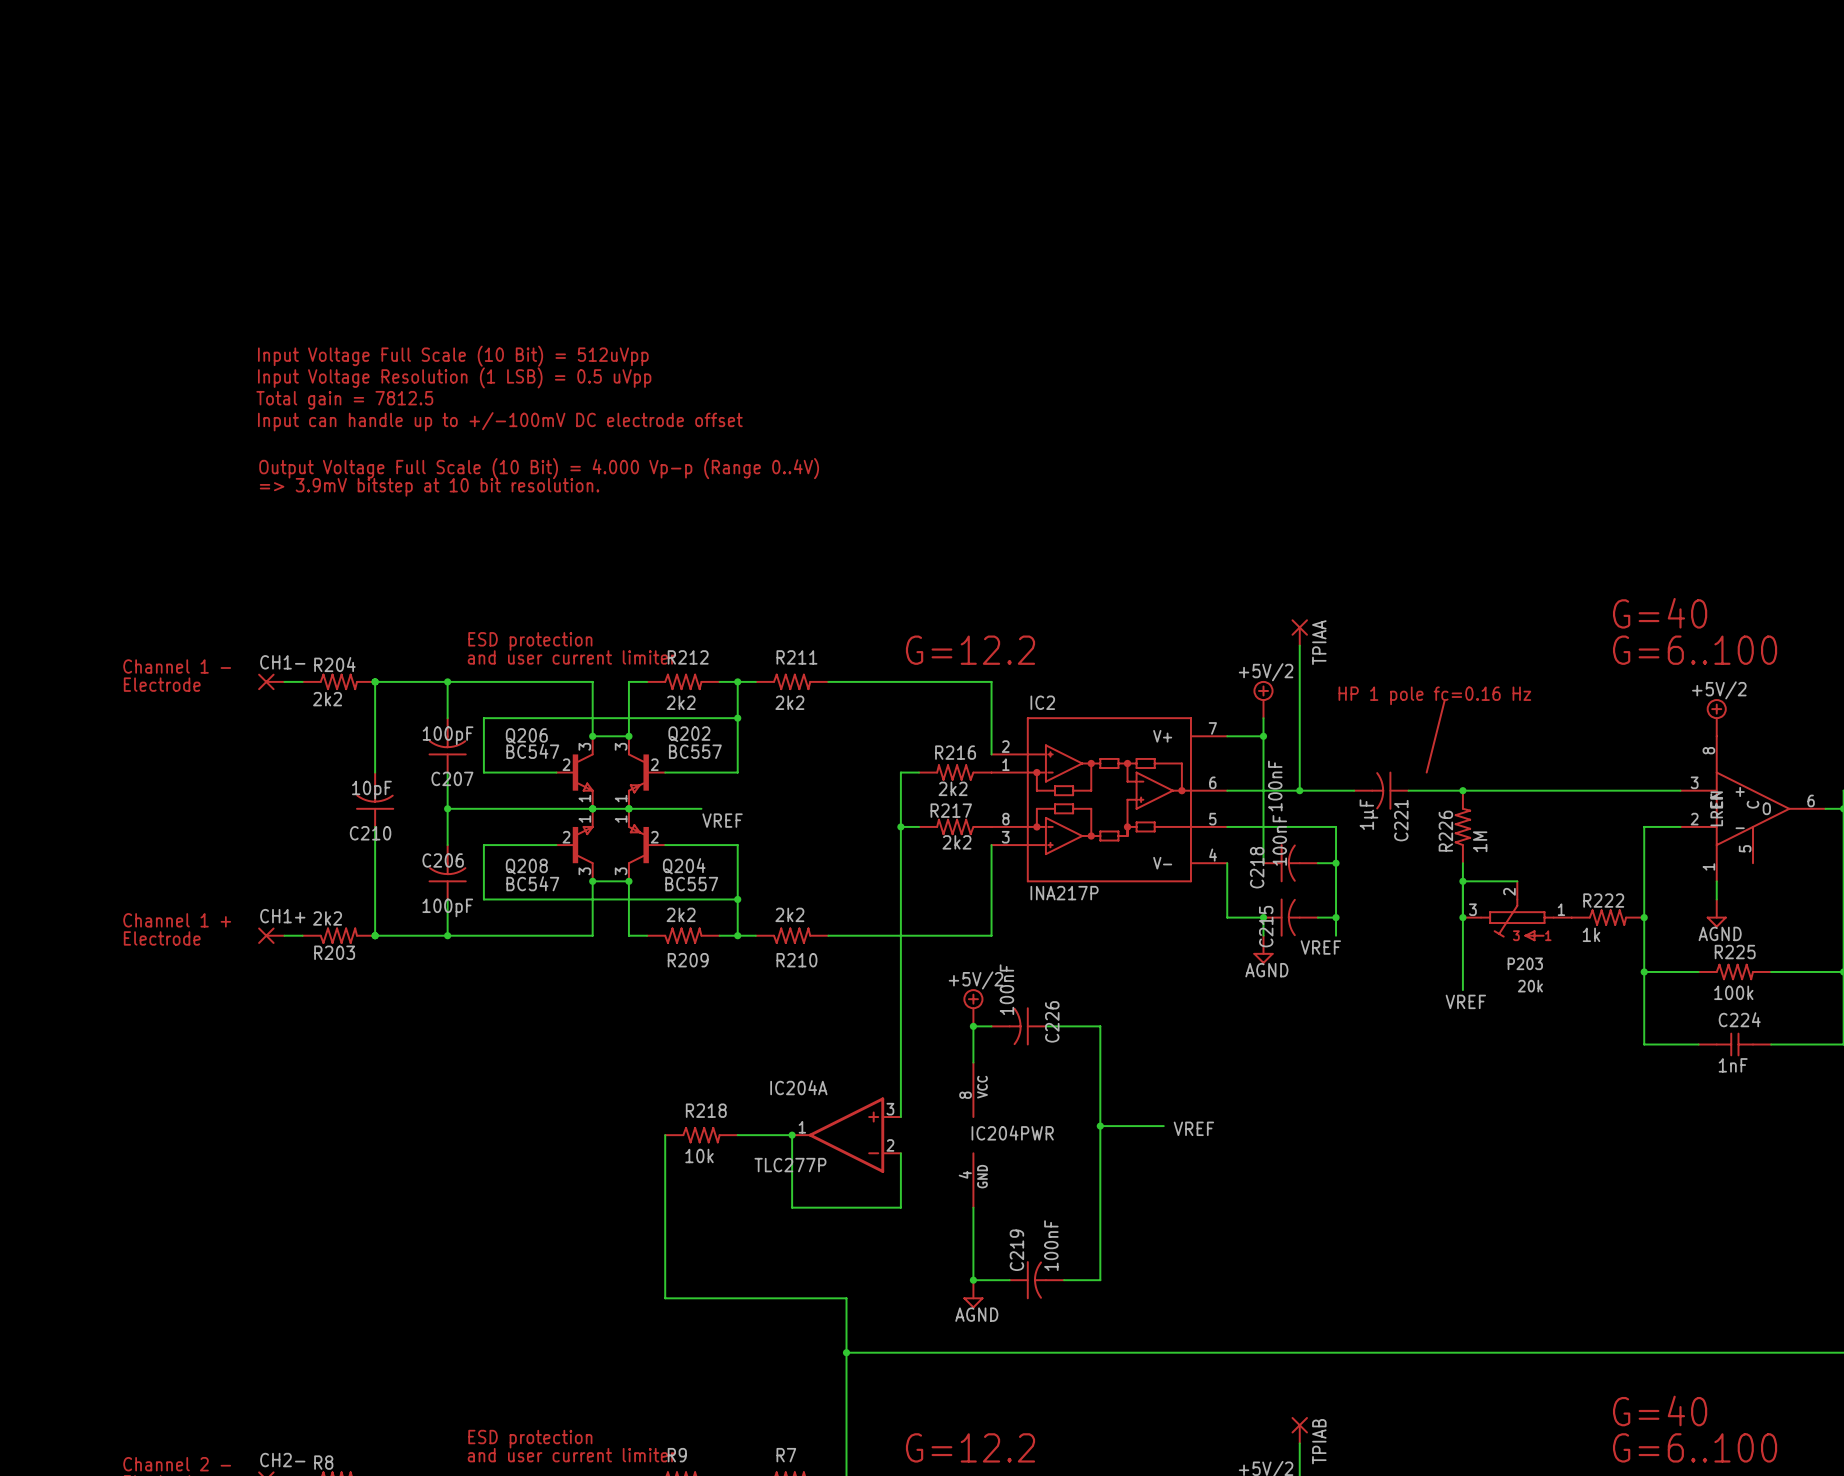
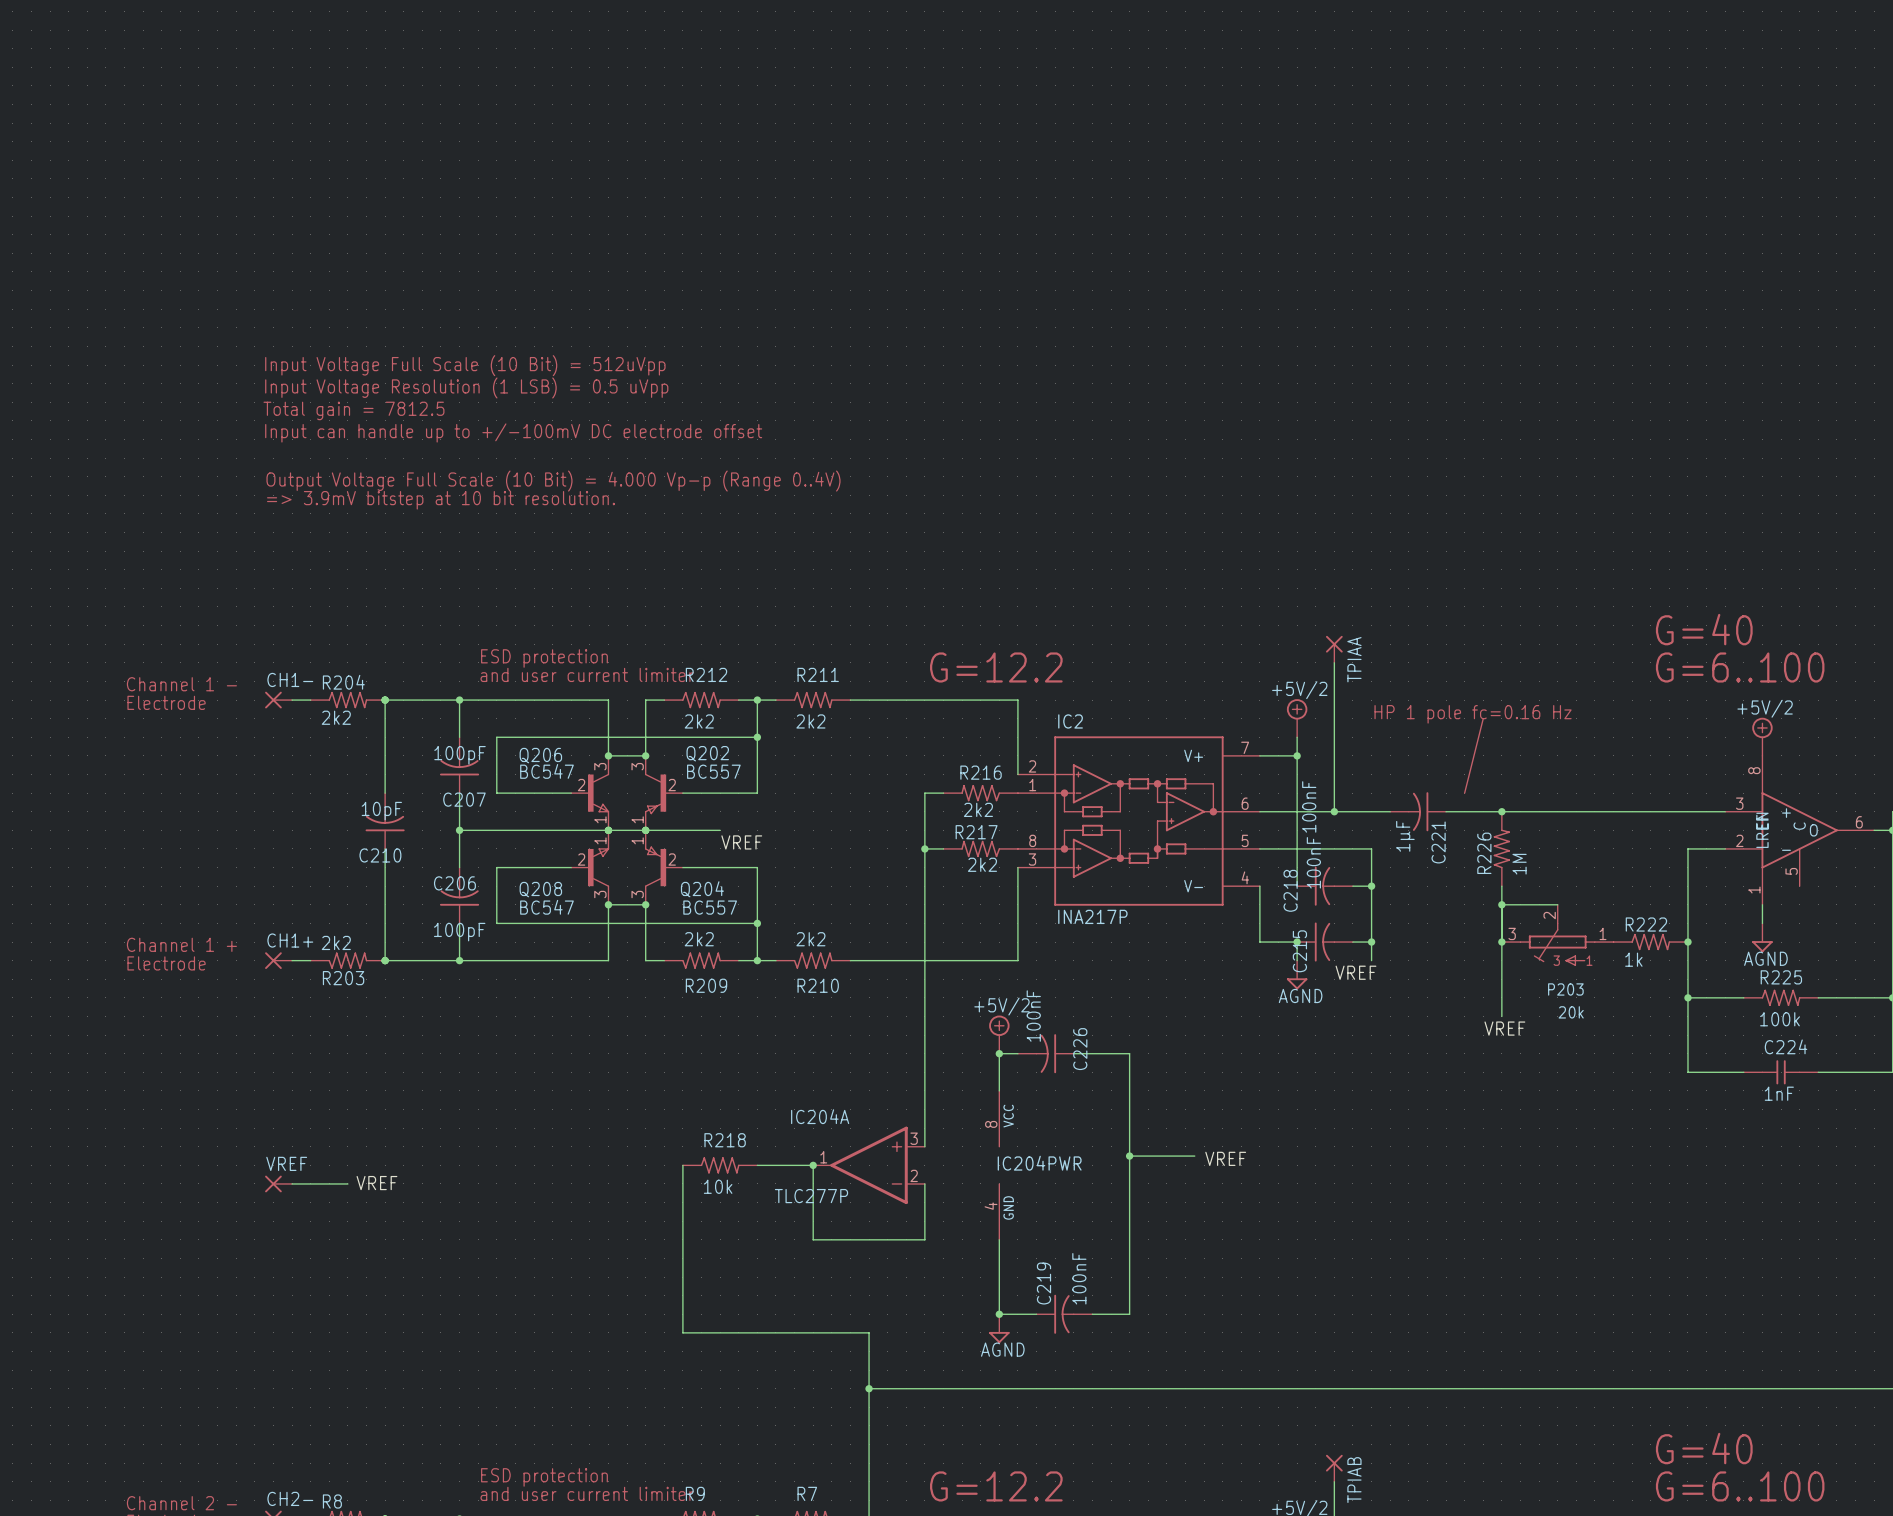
label: none -> VREF (376, 1183)
VREF: none -> (278, 1183)
wire: none -> (292, 1183) (347, 1183)

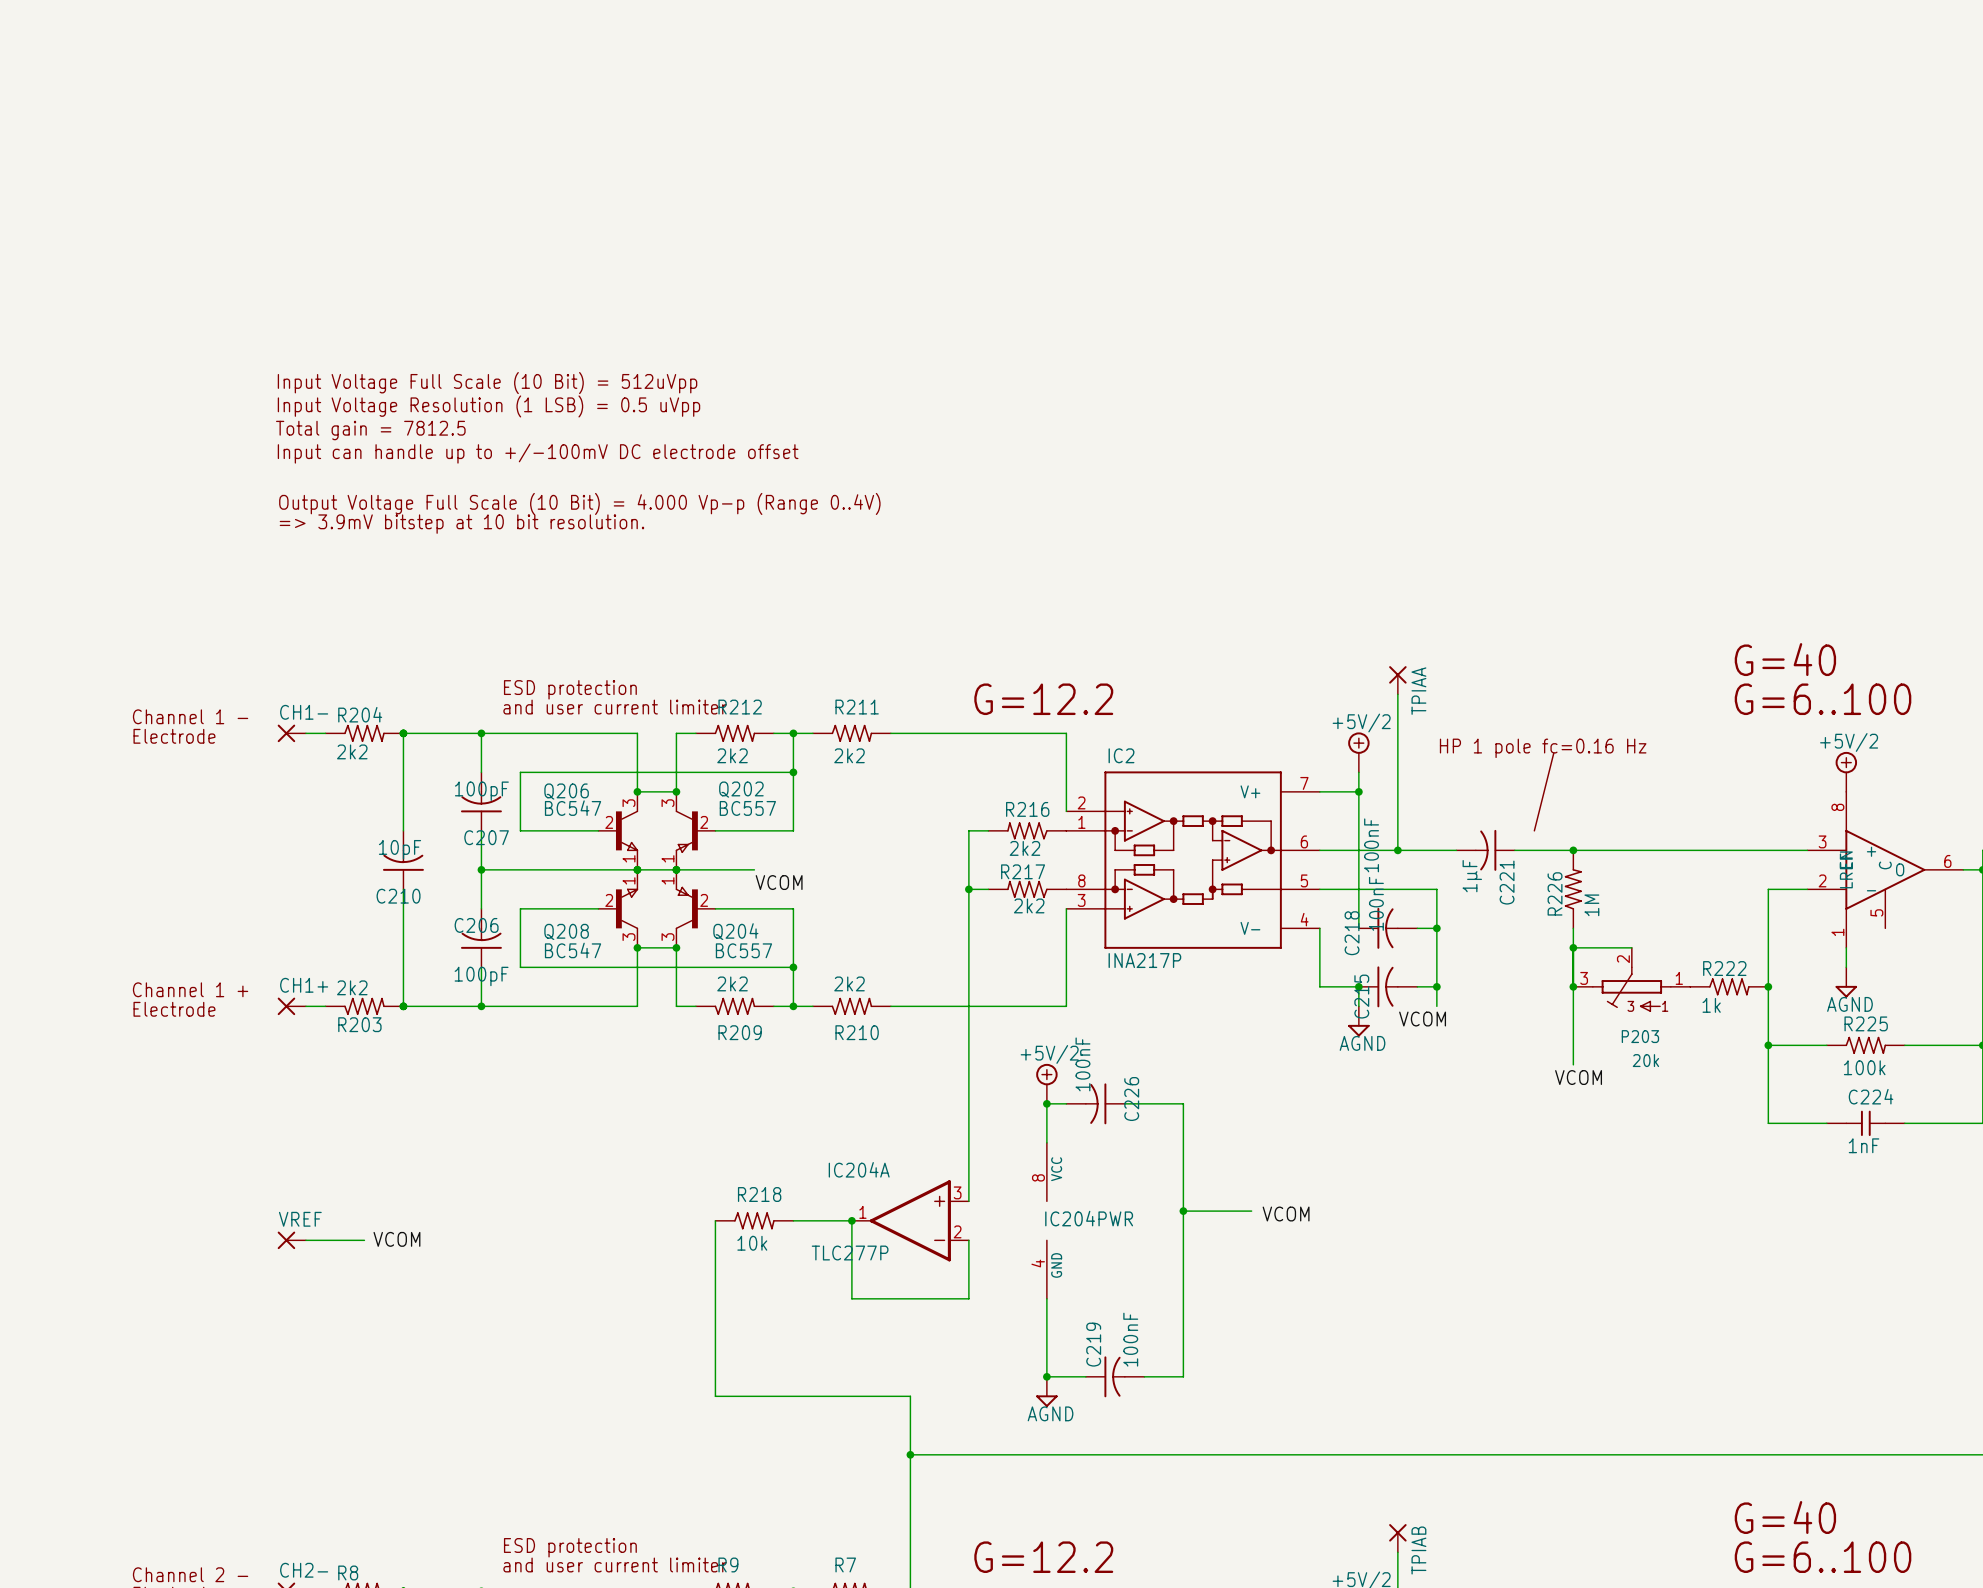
label: VREF (741, 842) -> VCOM (779, 882)
label: VREF (1355, 972) -> VCOM (1422, 1019)
label: VREF (1504, 1028) -> VCOM (1578, 1077)
label: VREF (1225, 1158) -> VCOM (1286, 1214)
label: VREF (376, 1183) -> VCOM (396, 1239)

